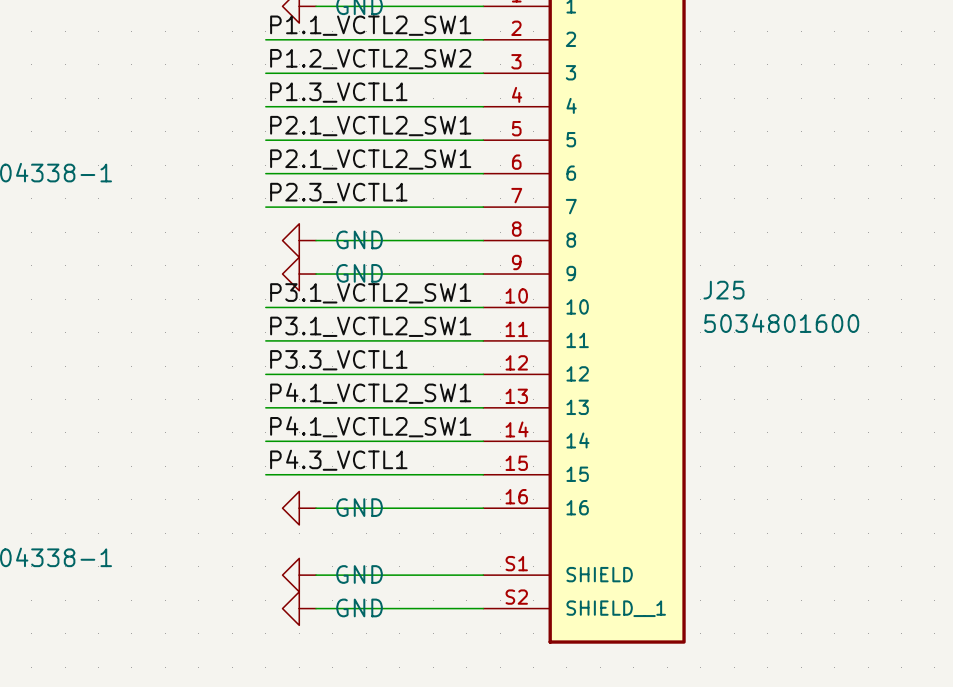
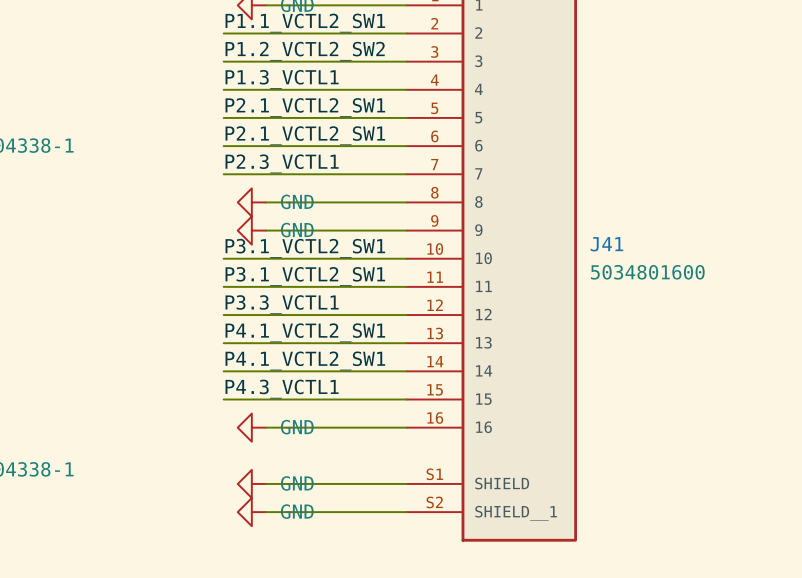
J25 name: J25 (723, 290) -> J41 (606, 244)

